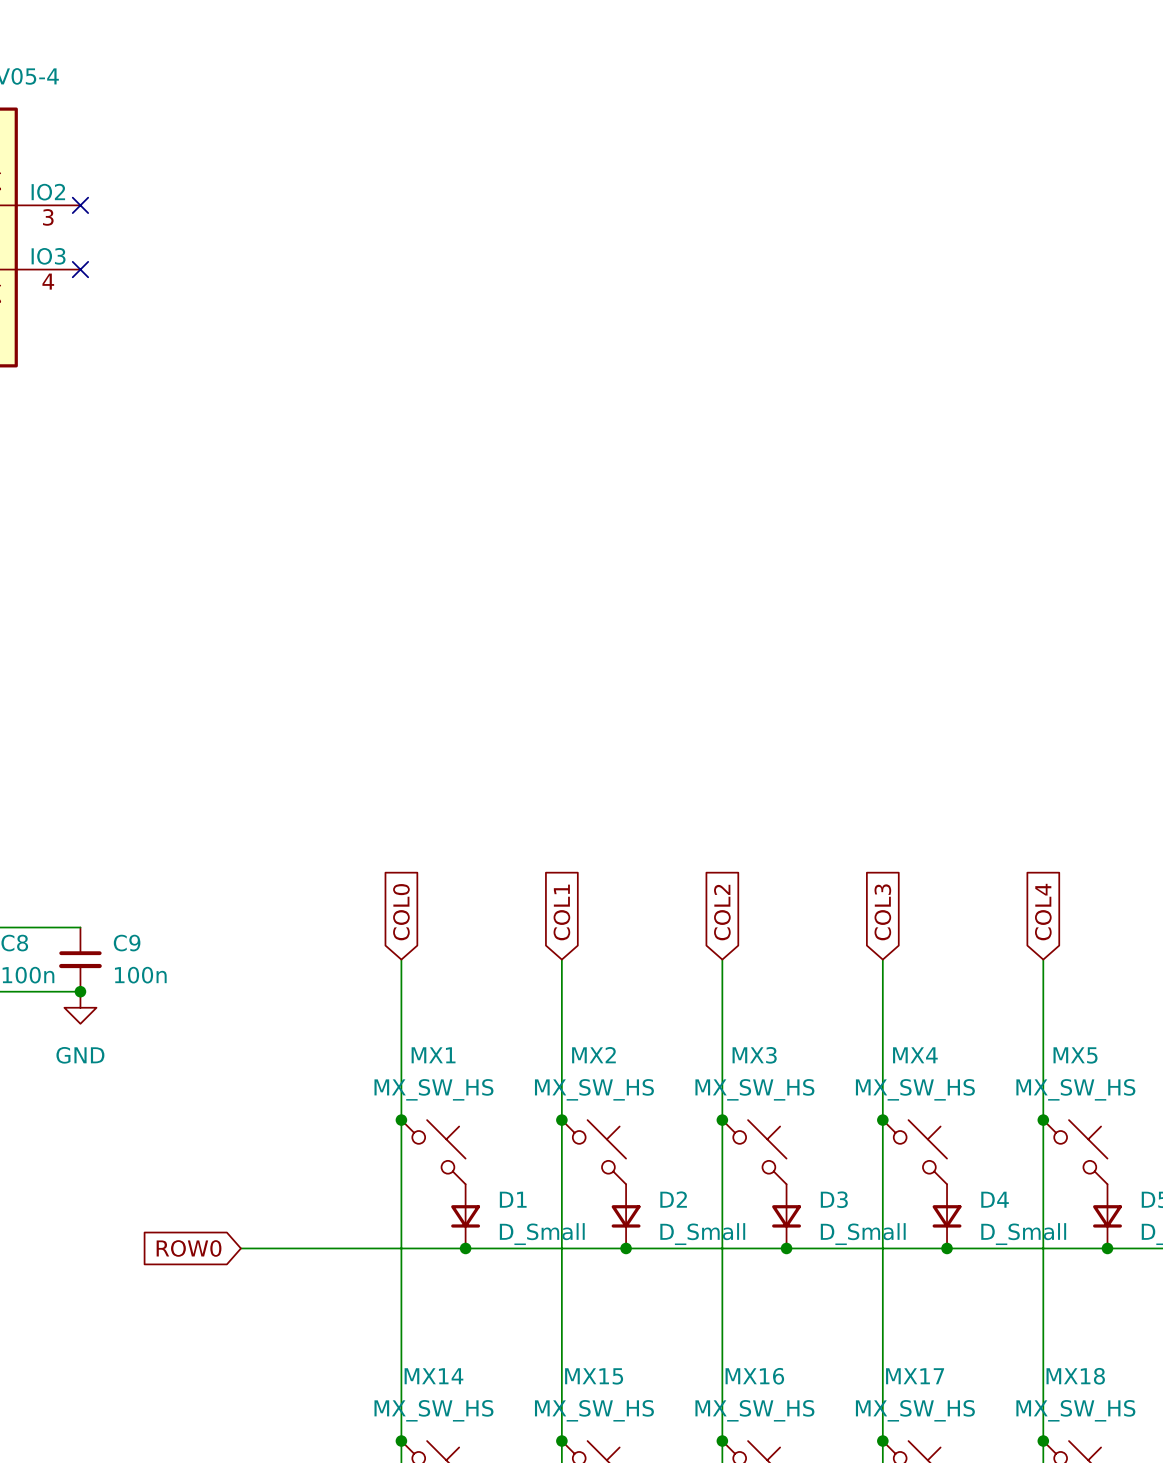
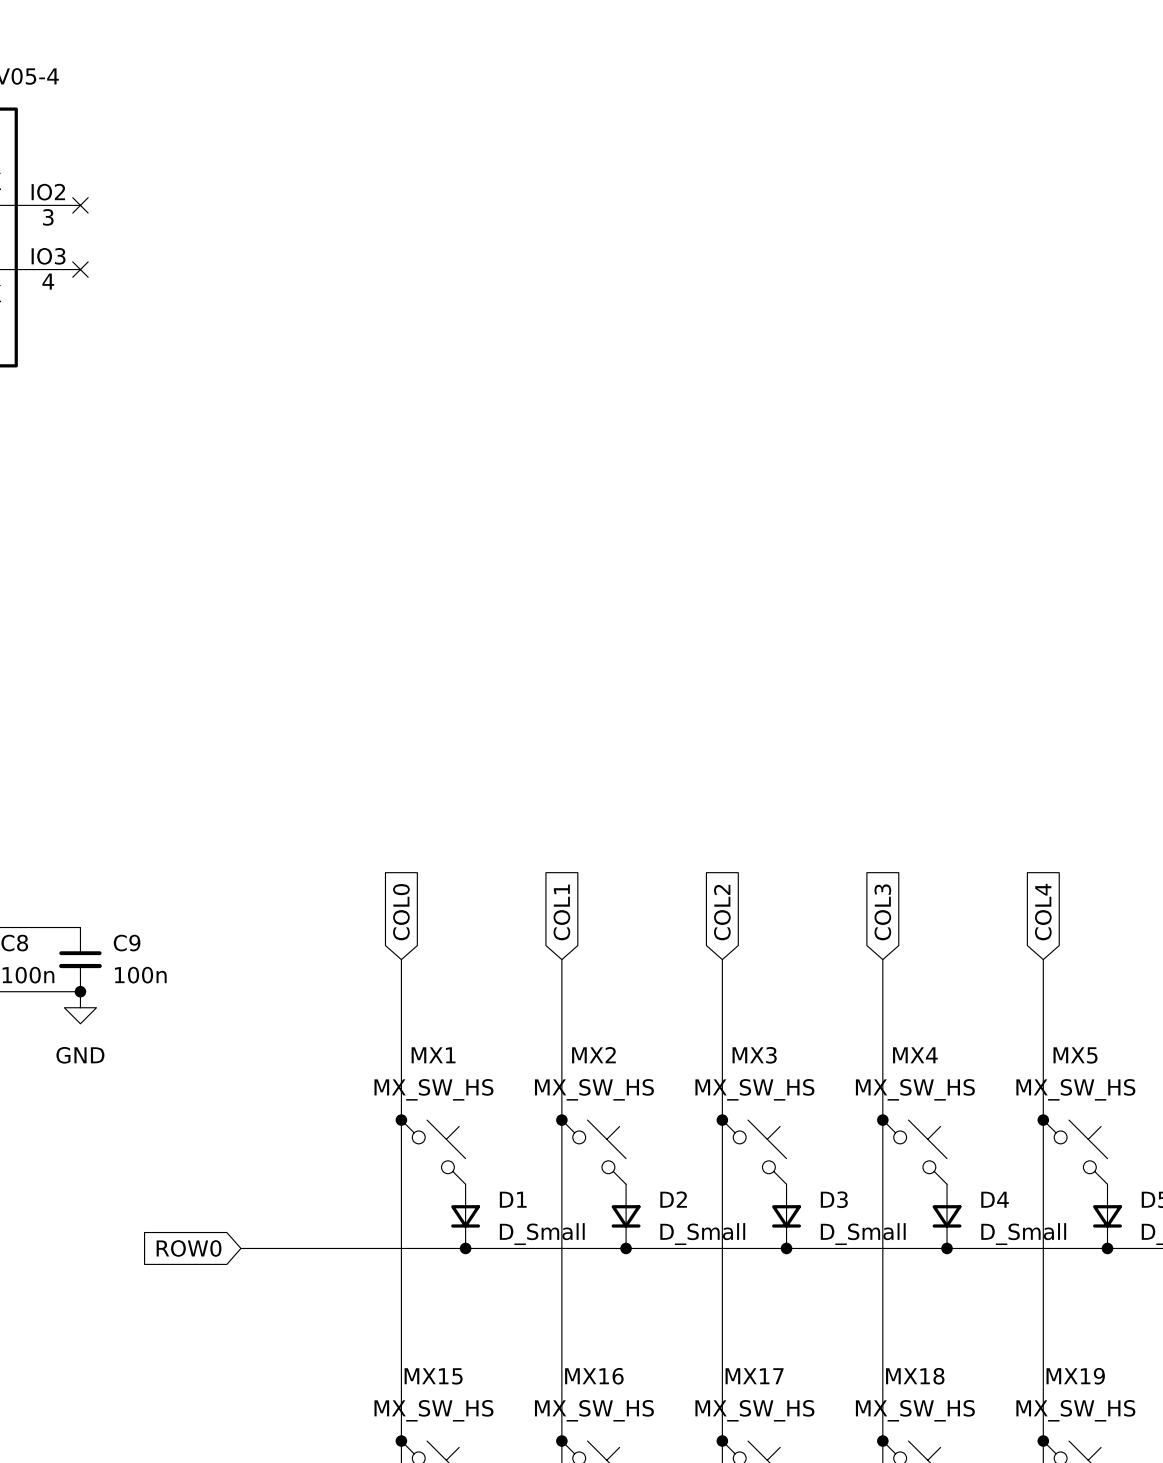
MX14 name: MX14 (433, 1376) -> MX15 (433, 1376)
MX15 name: MX15 (594, 1376) -> MX16 (594, 1376)
MX16 name: MX16 (754, 1376) -> MX17 (754, 1376)
MX17 name: MX17 (915, 1376) -> MX18 (915, 1376)
MX18 name: MX18 (1075, 1376) -> MX19 (1075, 1376)

